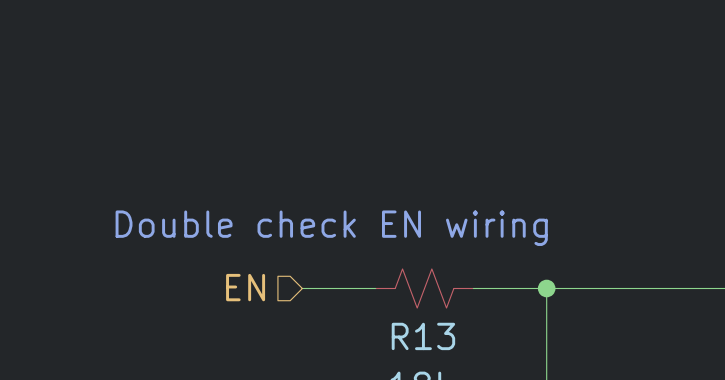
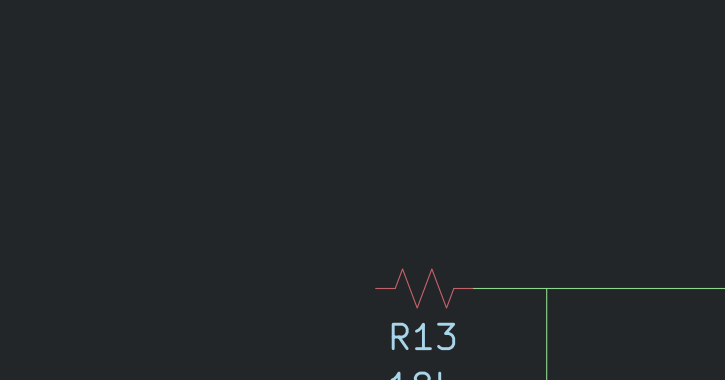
text: Double check EN wiring (331, 228) -> none
hierarchical label: EN (245, 287) -> none
wire: (302, 288) (375, 288) -> none
junction: (546, 288) -> none

